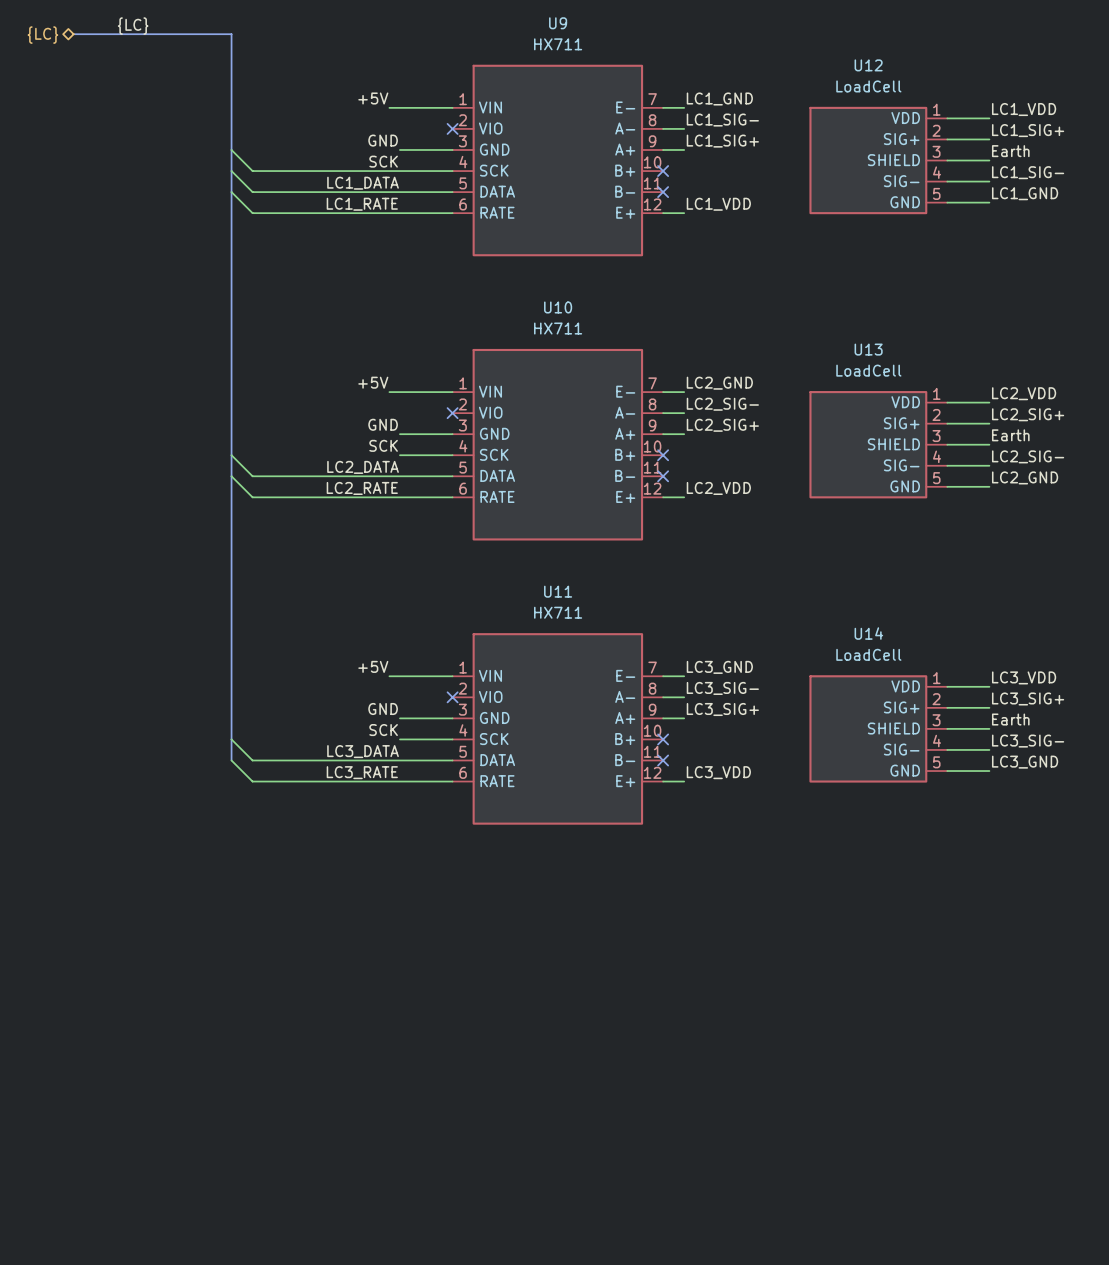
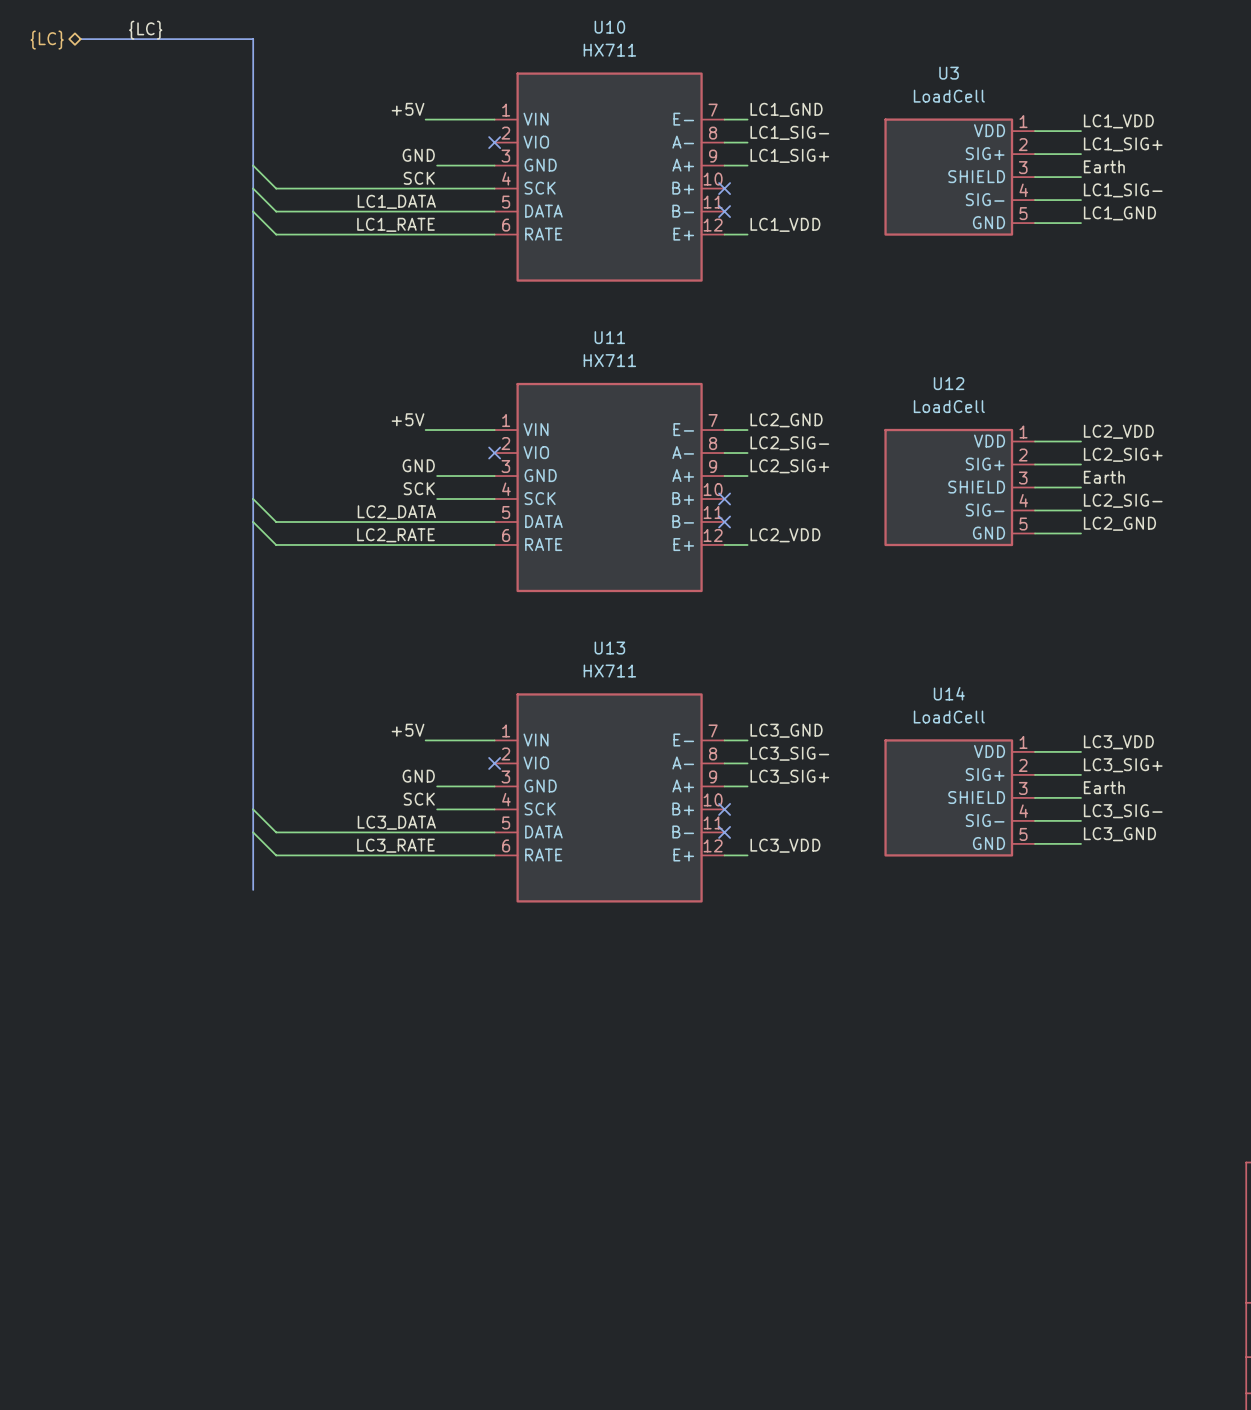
U9 name: U9 (558, 23) -> U10 (609, 27)
U12 name: U12 (868, 65) -> U3 (949, 73)
U10 name: U10 (558, 307) -> U11 (609, 337)
U13 name: U13 (868, 349) -> U12 (949, 383)
U11 name: U11 (558, 591) -> U13 (609, 648)
bus: none -> (253, 832) (253, 889)

